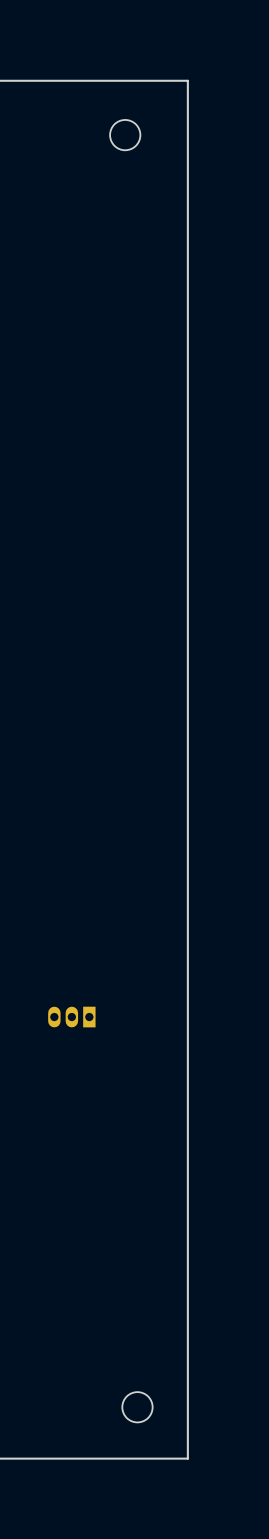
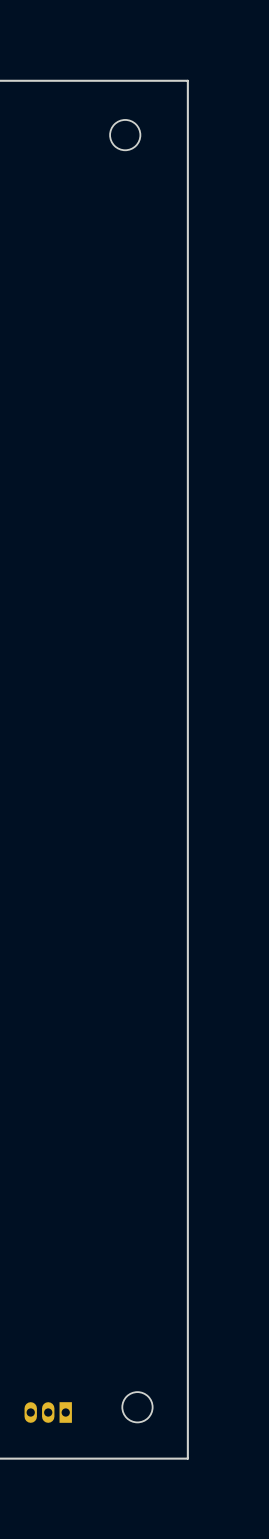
part: (71, 1017) -> none
part: none -> (48, 1412)

